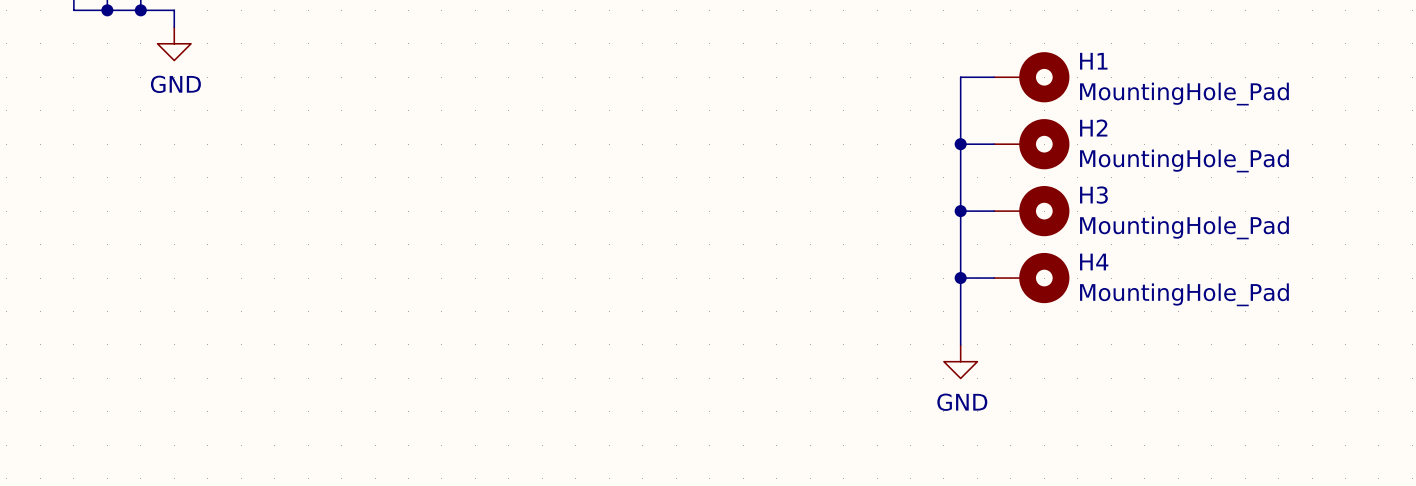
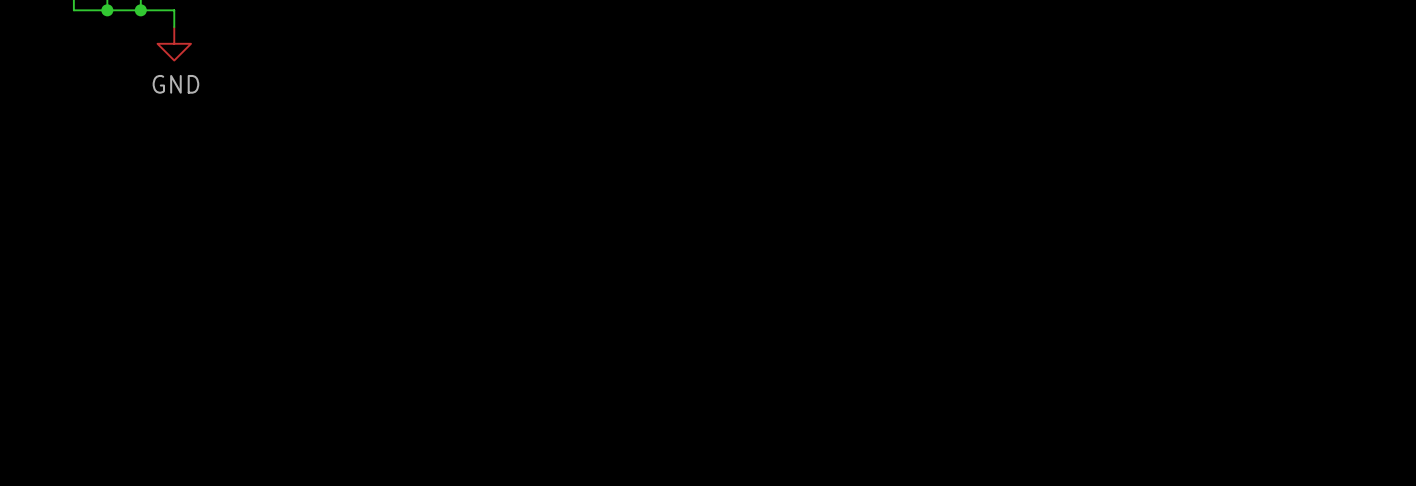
wire: (994, 77) (960, 77) (960, 344) -> none
H1: MountingHole_Pad (1031, 77) -> none
wire: (960, 144) (994, 144) -> none
junction: (960, 144) -> none
H2: MountingHole_Pad (1031, 144) -> none
wire: (960, 211) (994, 211) -> none
junction: (960, 211) -> none
H3: MountingHole_Pad (1031, 211) -> none
wire: (960, 278) (994, 278) -> none
junction: (960, 278) -> none
H4: MountingHole_Pad (1031, 278) -> none
power symbol: GND (960, 361) -> none

